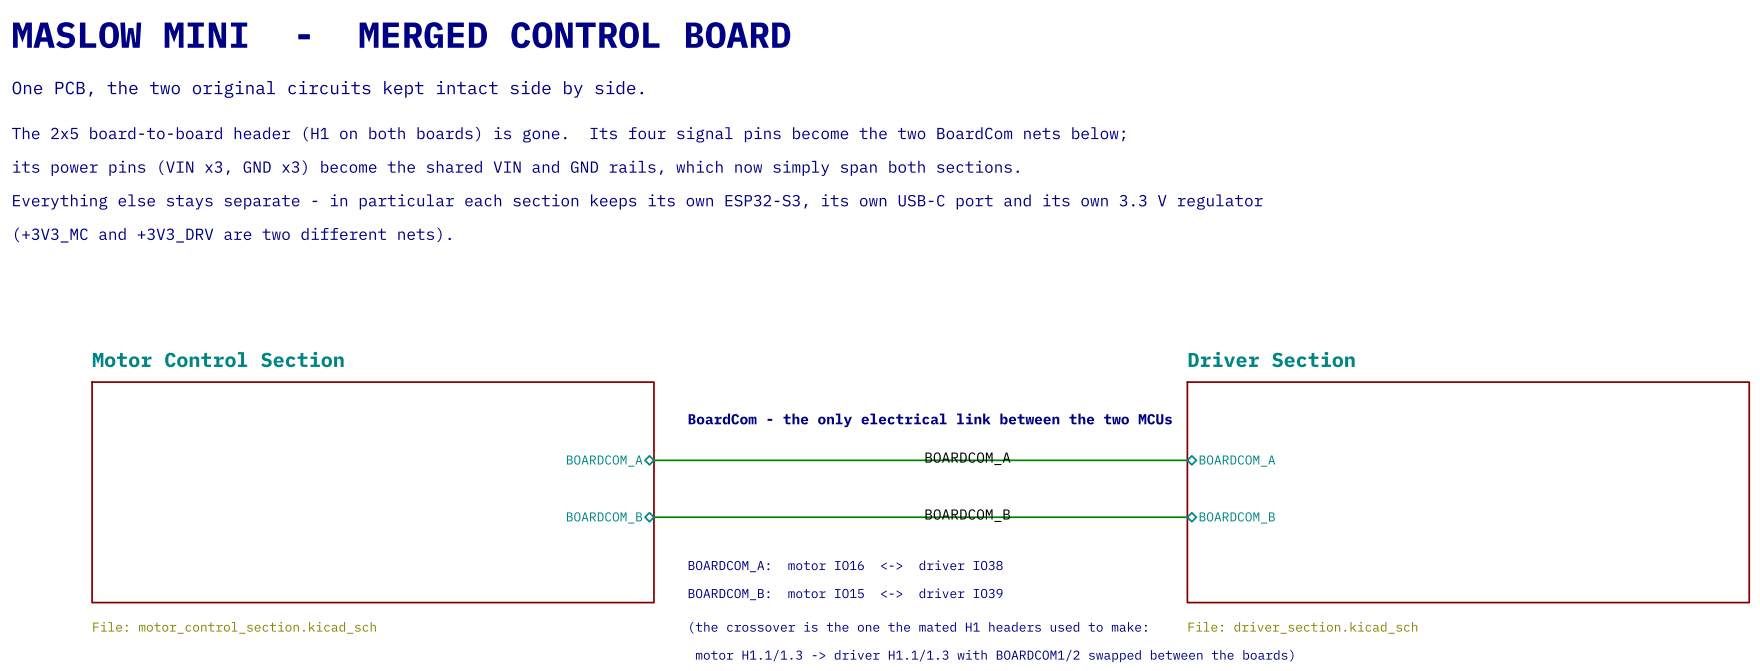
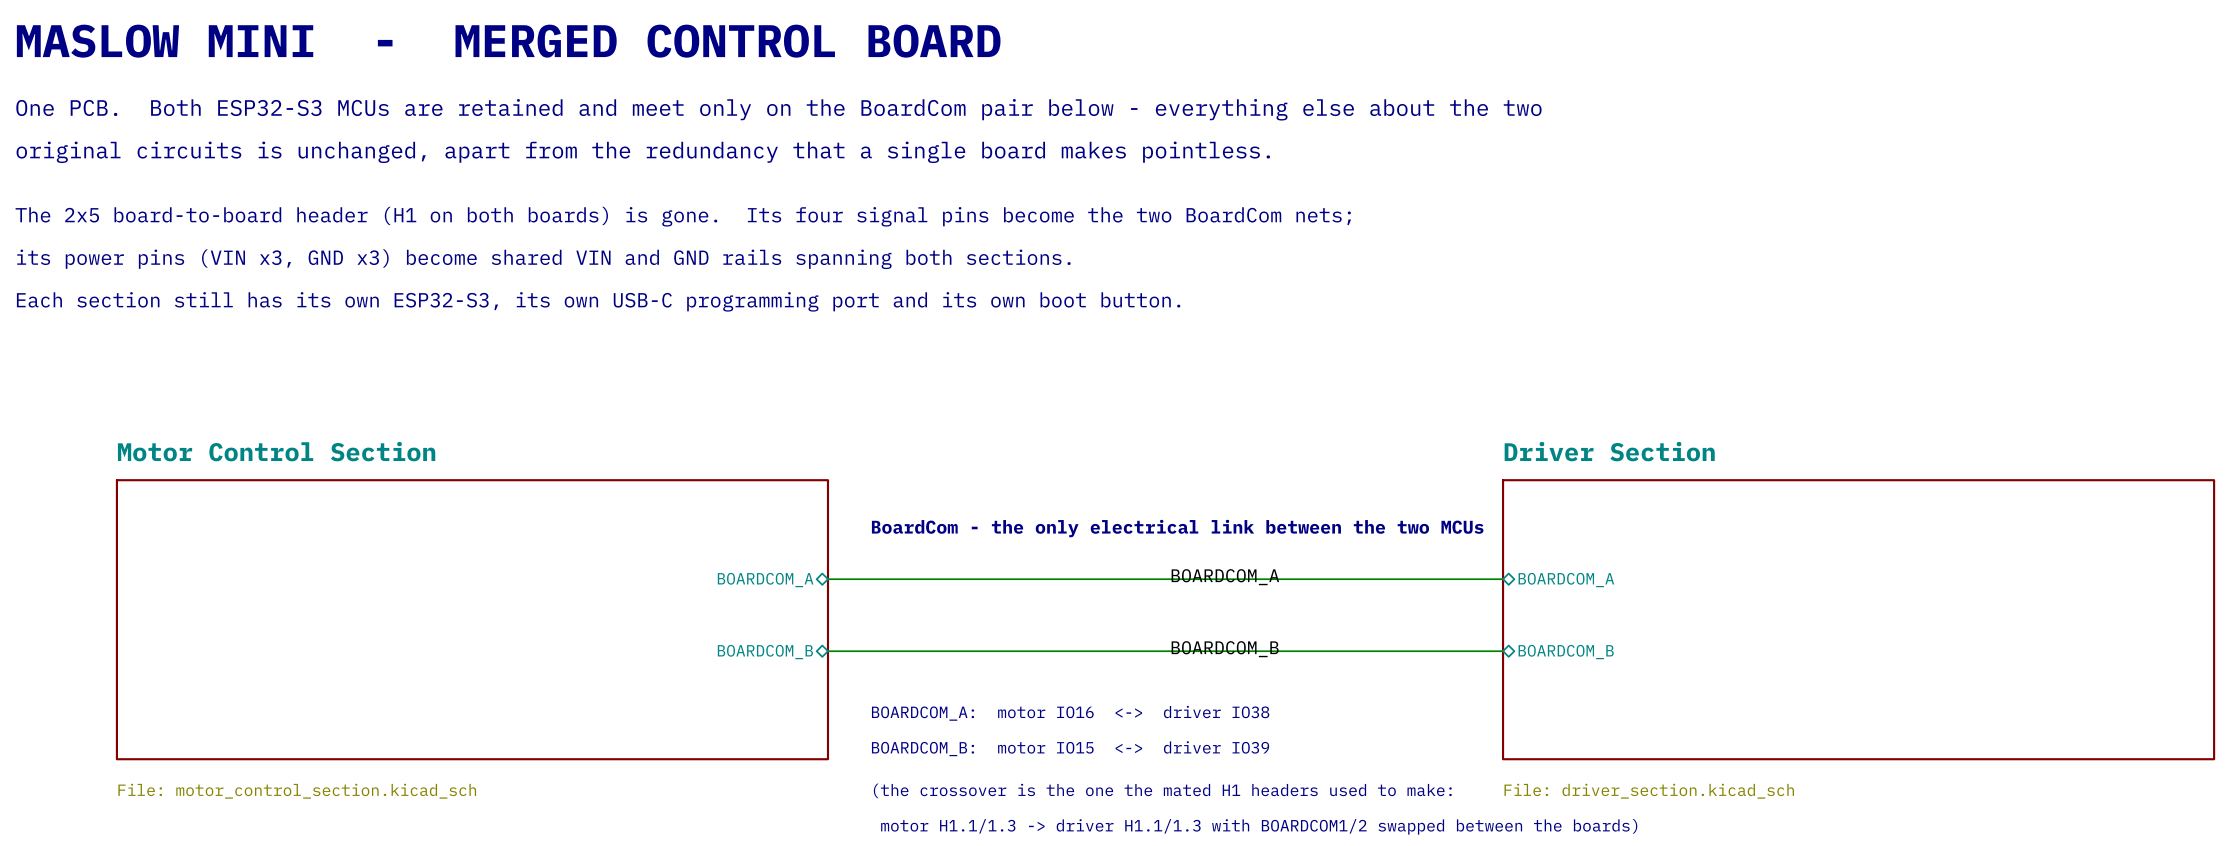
text: One PCB, the two original circuits kept intact side by side. (327, 89) -> One PCB. Both ESP32-S3 MCUs are retained and meet only on the BoardCom pair below - everything else about the two (778, 109)
text: none -> original circuits is unchanged, apart from the redundancy that a single board makes pointless. (643, 152)
text: The 2x5 board-to-board header (H1 on both boards) is gone. Its four signal pins become the two BoardCom nets below; (568, 134) -> none
text: its power pins (VIN x3, GND x3) become the shared VIN and GND rails, which now simply span both sections. (516, 168) -> The 2x5 board-to-board header (H1 on both boards) is gone. Its four signal pins become the two BoardCom nets; (683, 216)
text: Everything else stays separate - in particular each section keeps its own ESP32-S3, its own USB-C port and its own 3.3 V regulator (637, 201) -> its power pins (VIN x3, GND x3) become shared VIN and GND rails spanning both sections. (543, 259)
text: (+3V3_MC and +3V3_DRV are two different nets). (232, 235) -> Each section still has its own ESP32-S3, its own USB-C programming port and its own boot button. (598, 301)

